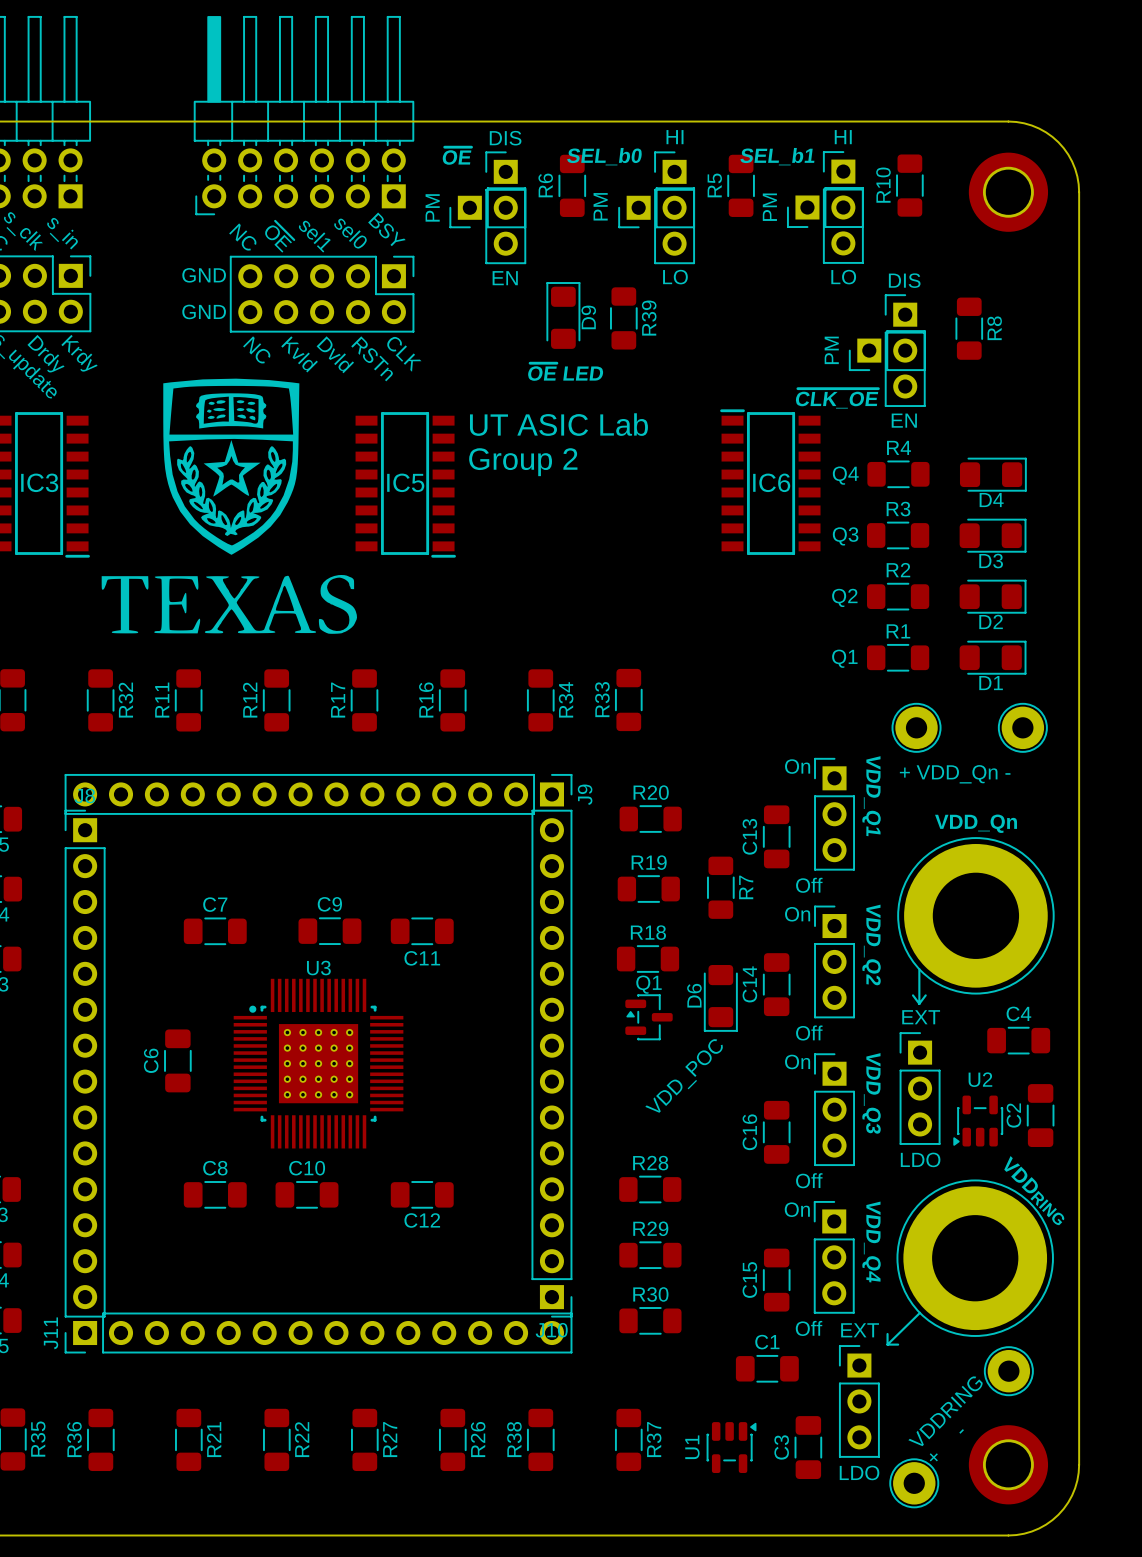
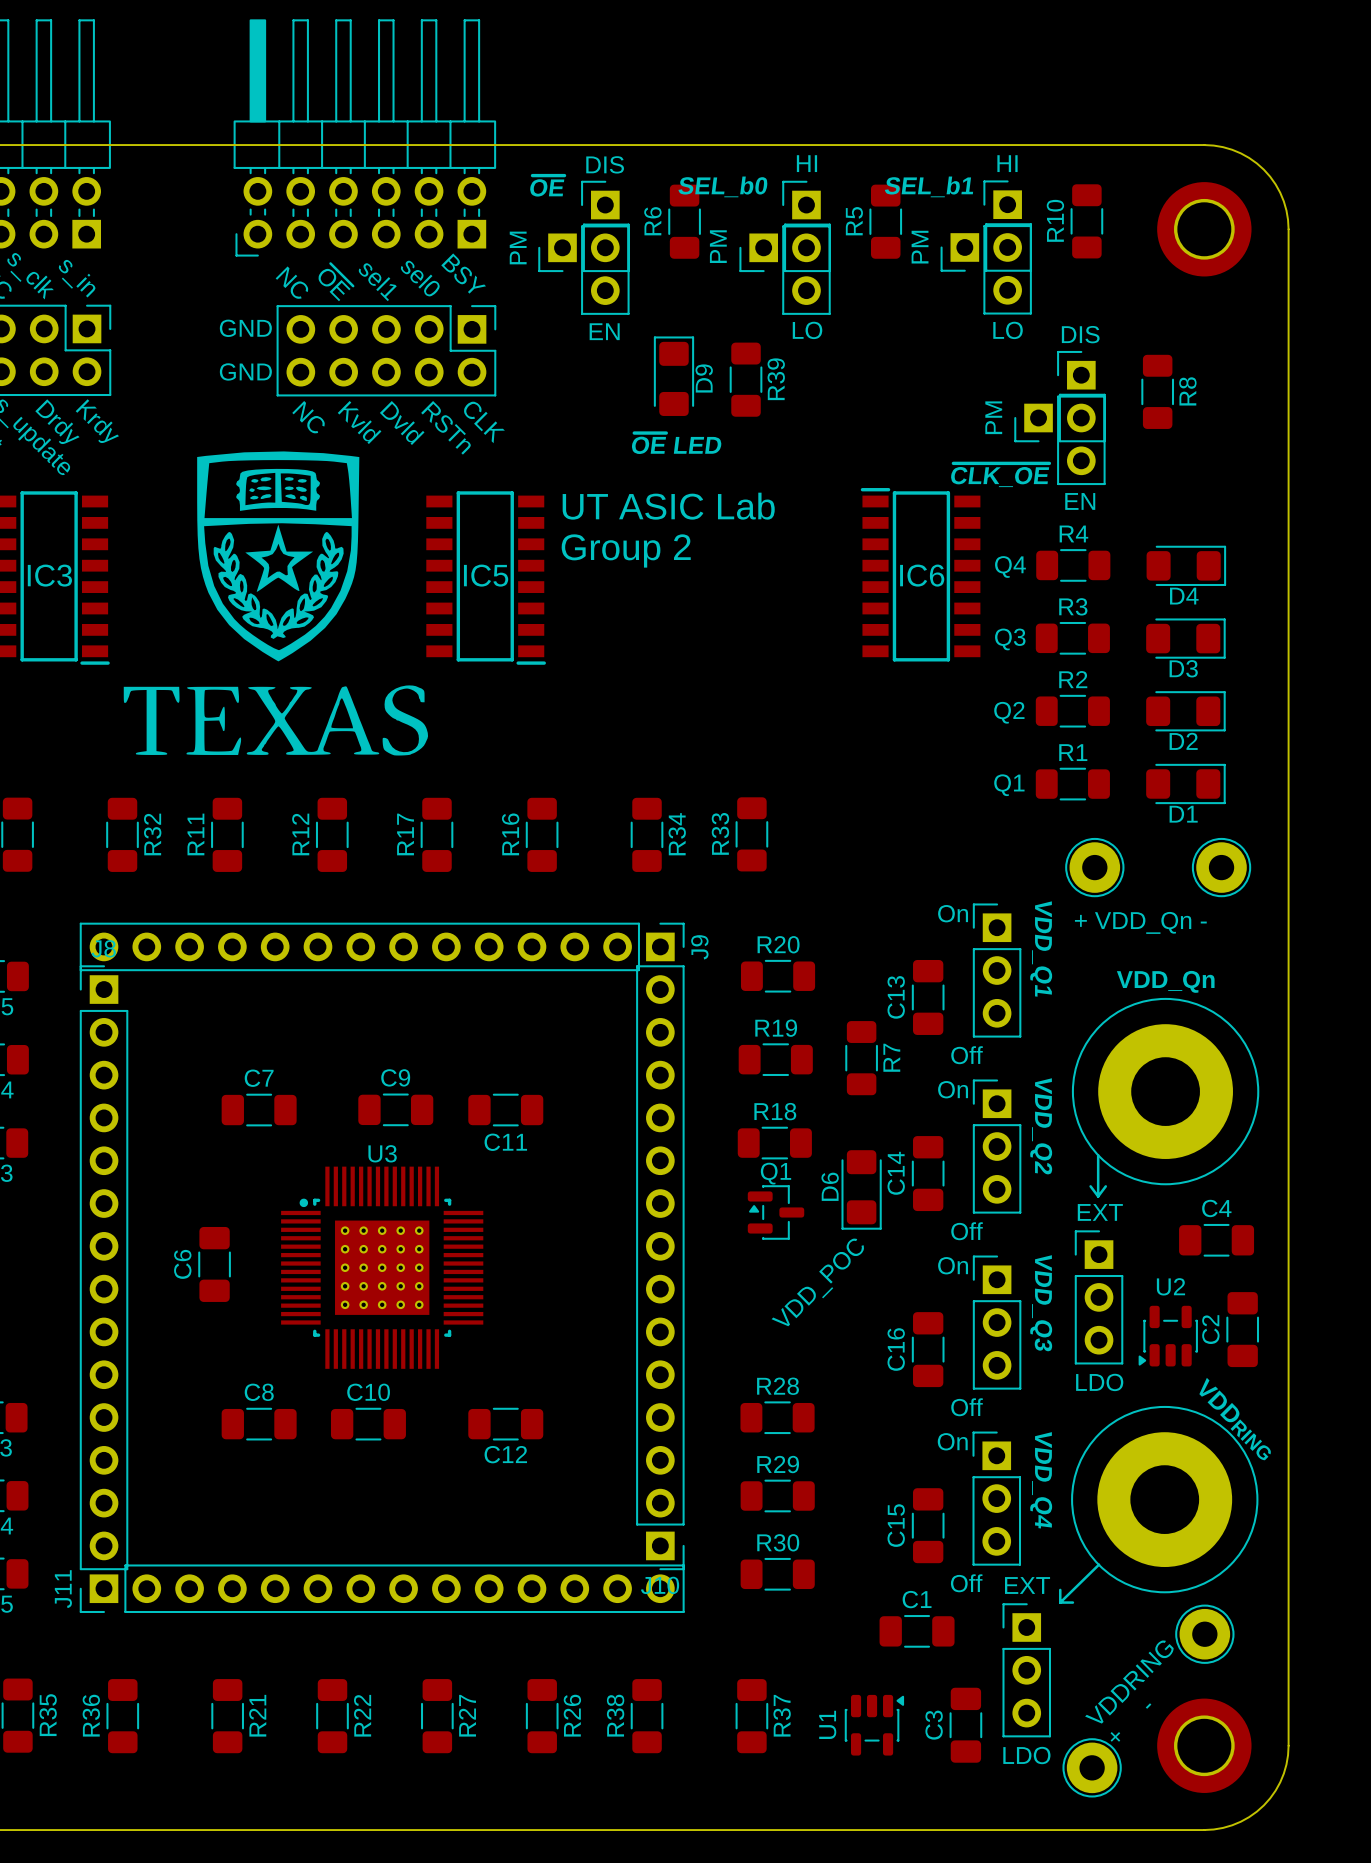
part footprint: [897, 837, 1055, 995] -> [1071, 997, 1260, 1186]
part footprint: [896, 1179, 1054, 1337] -> [1071, 1405, 1259, 1594]

